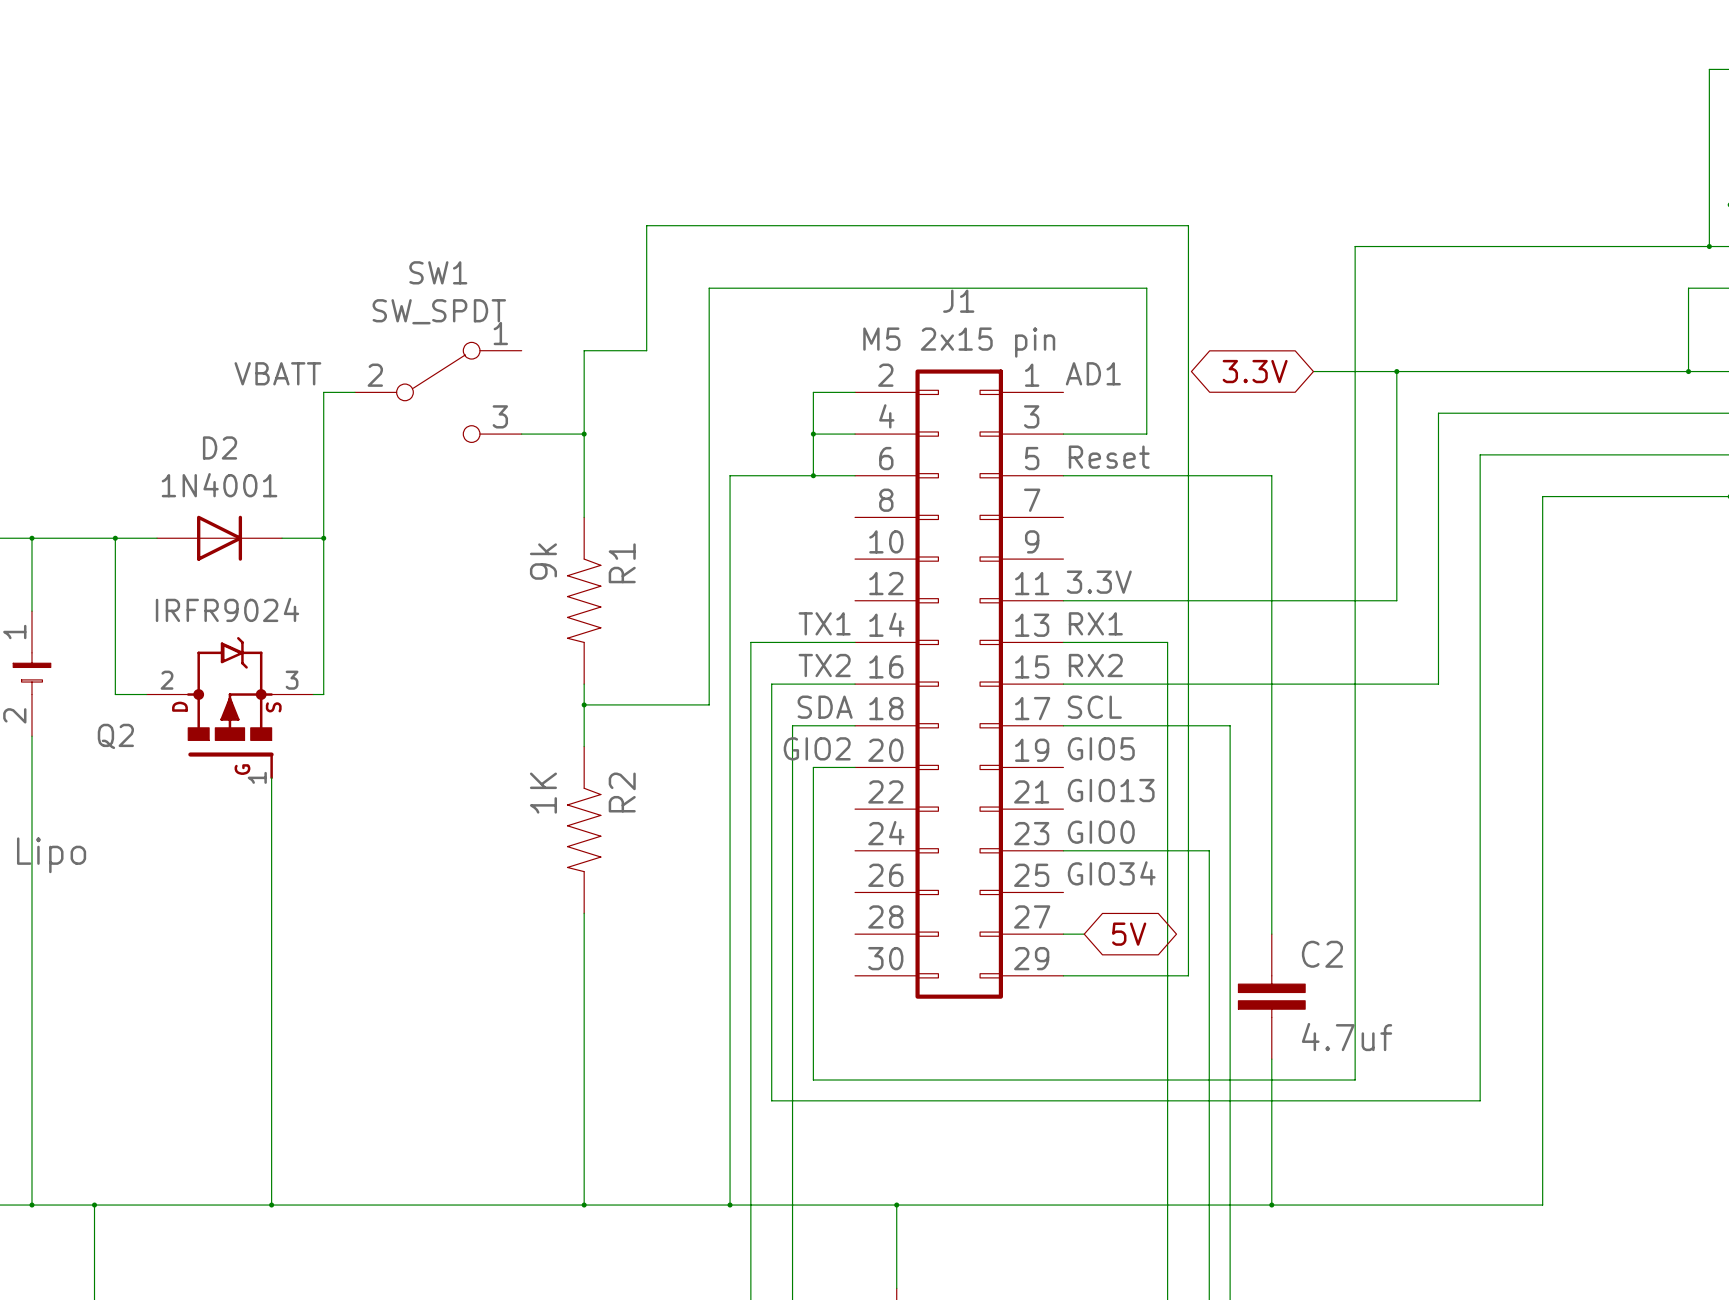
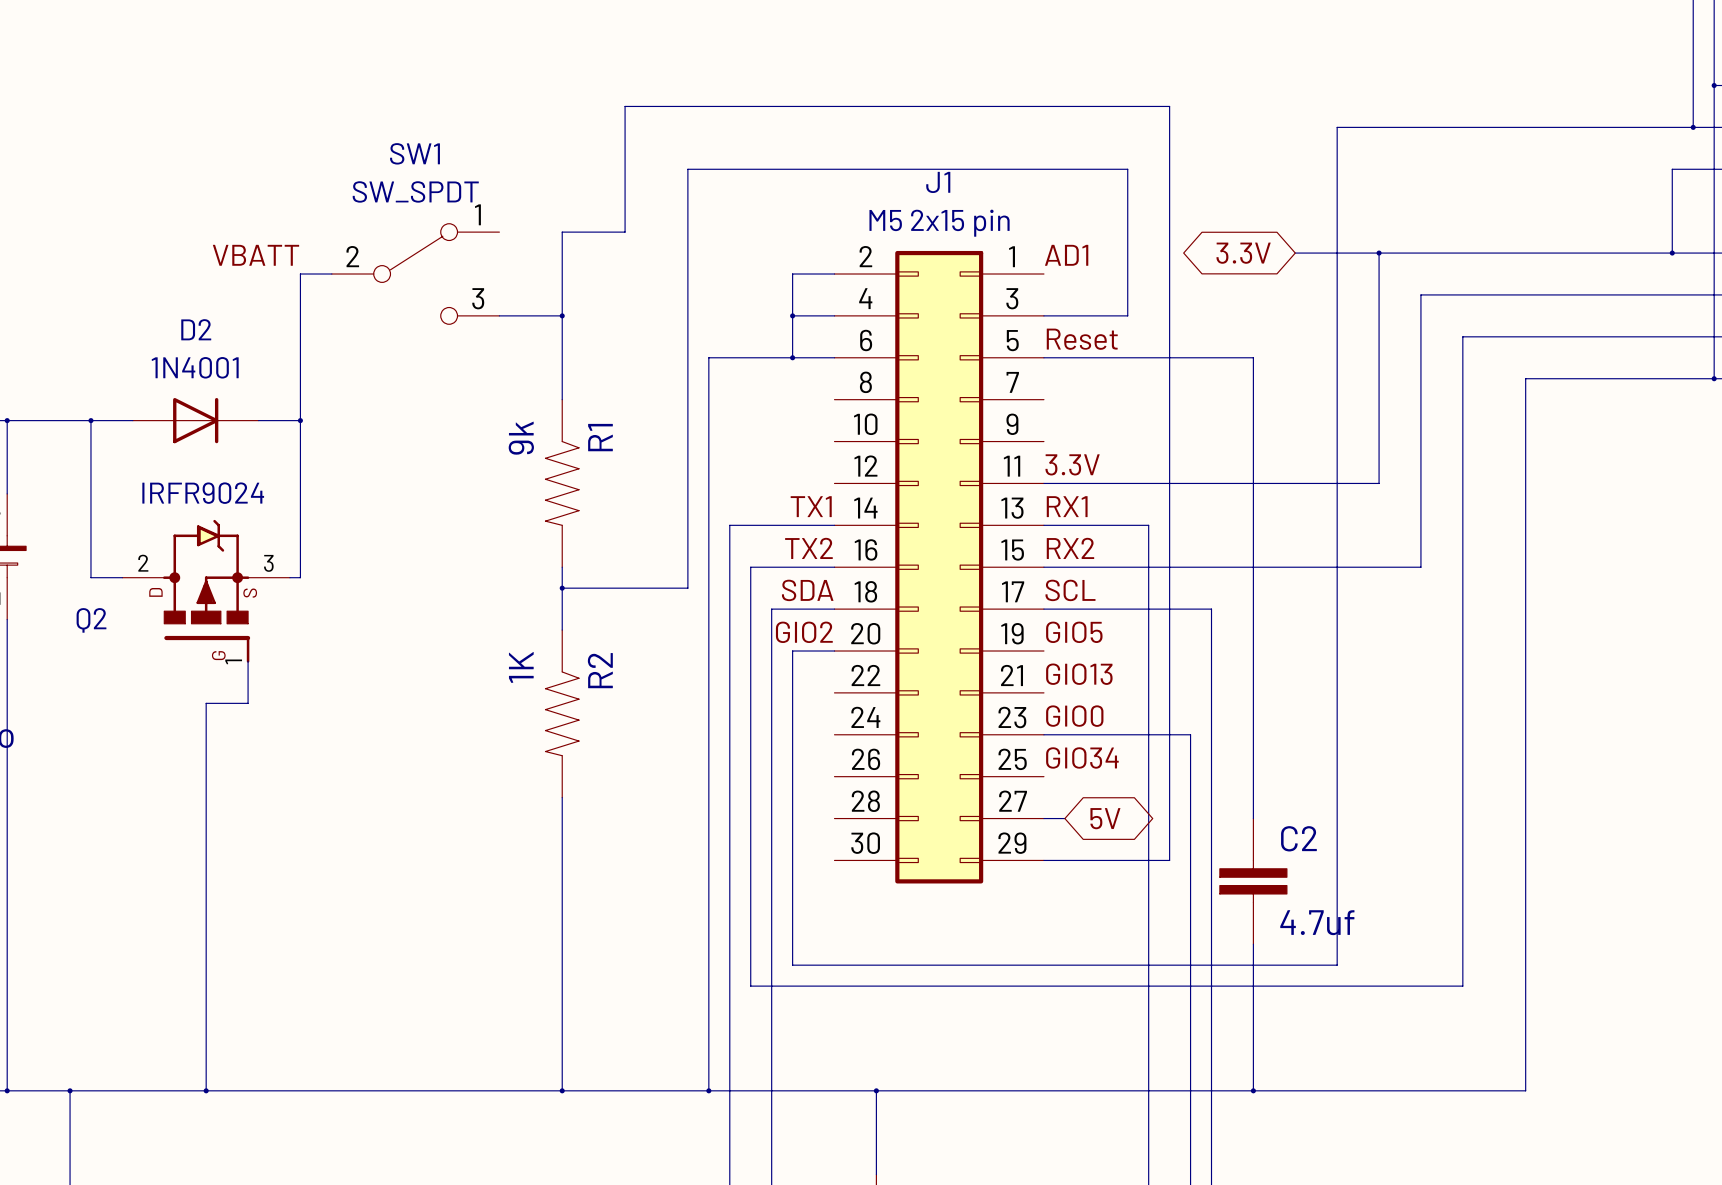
wire: (271, 819) (271, 1205) -> (248, 703) (206, 703) (206, 1090)
junction position: (271, 1205) -> (206, 1090)

